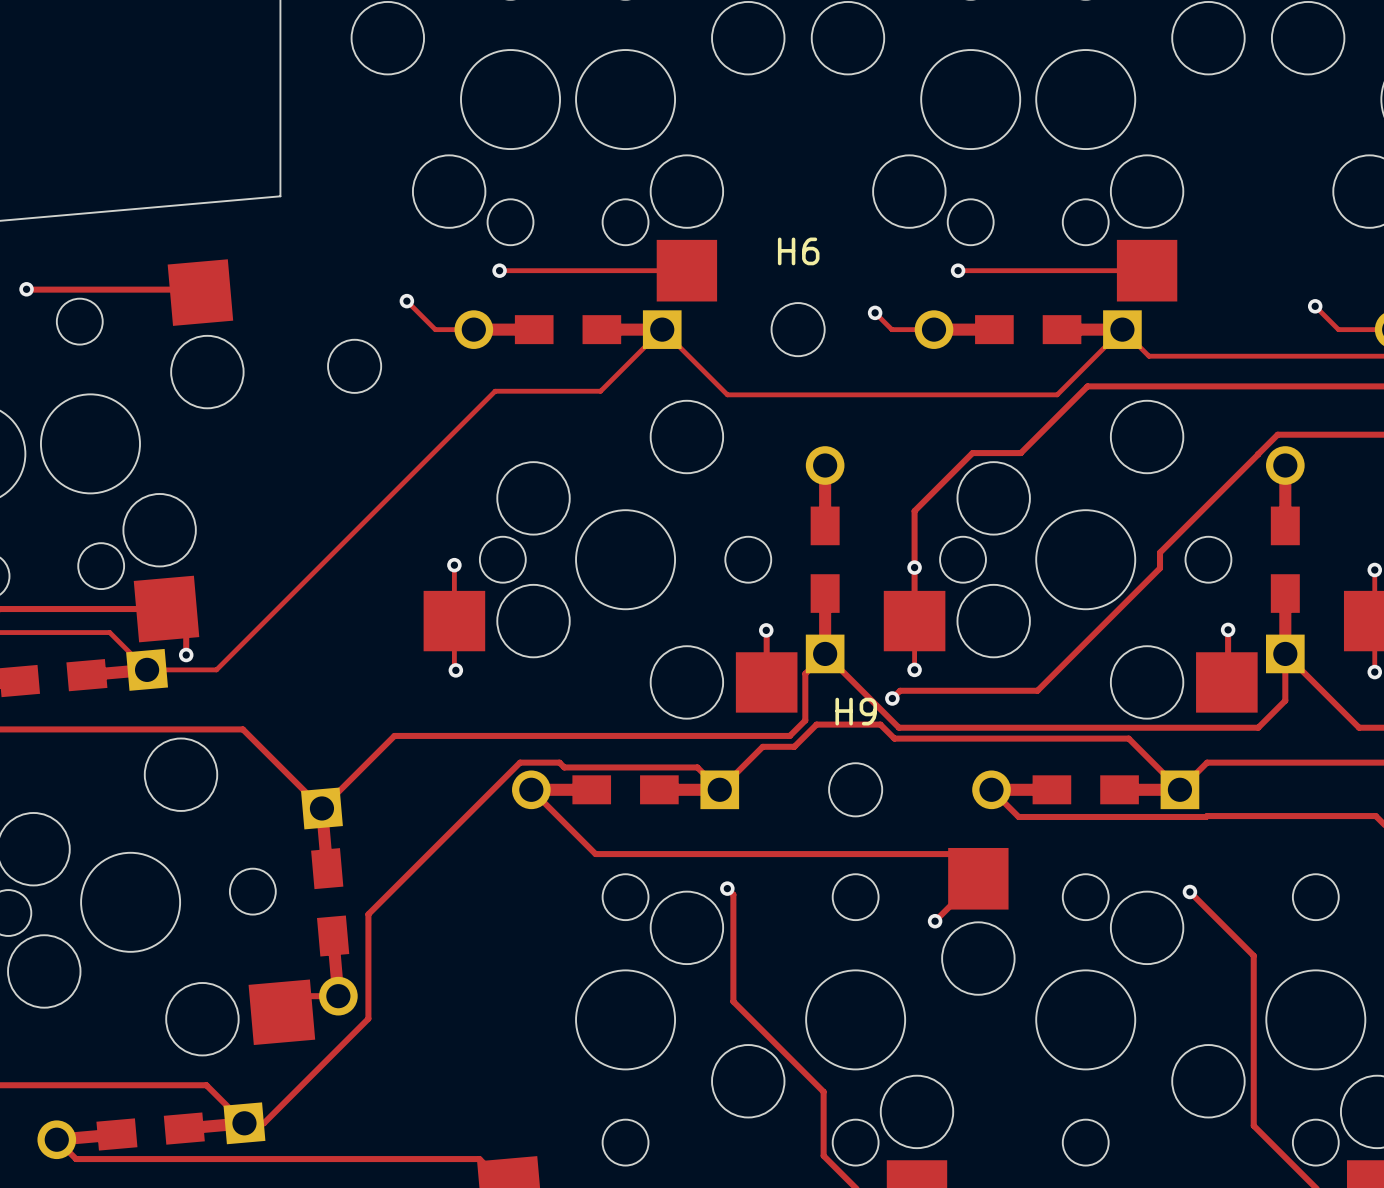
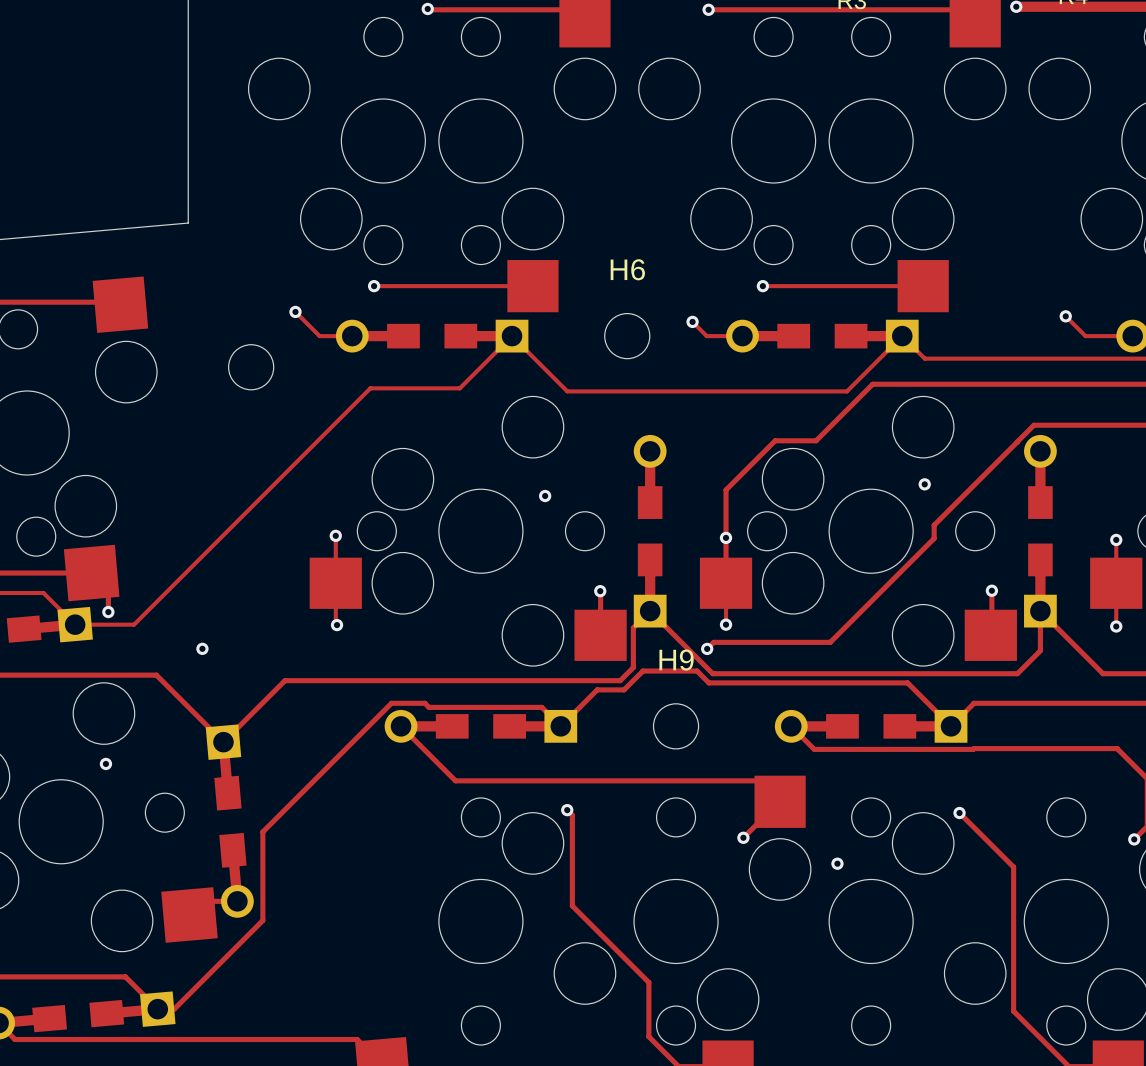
via: none -> (924, 484)
via: none -> (545, 496)
via: none -> (202, 648)
via: none -> (105, 763)
via: none -> (837, 863)

